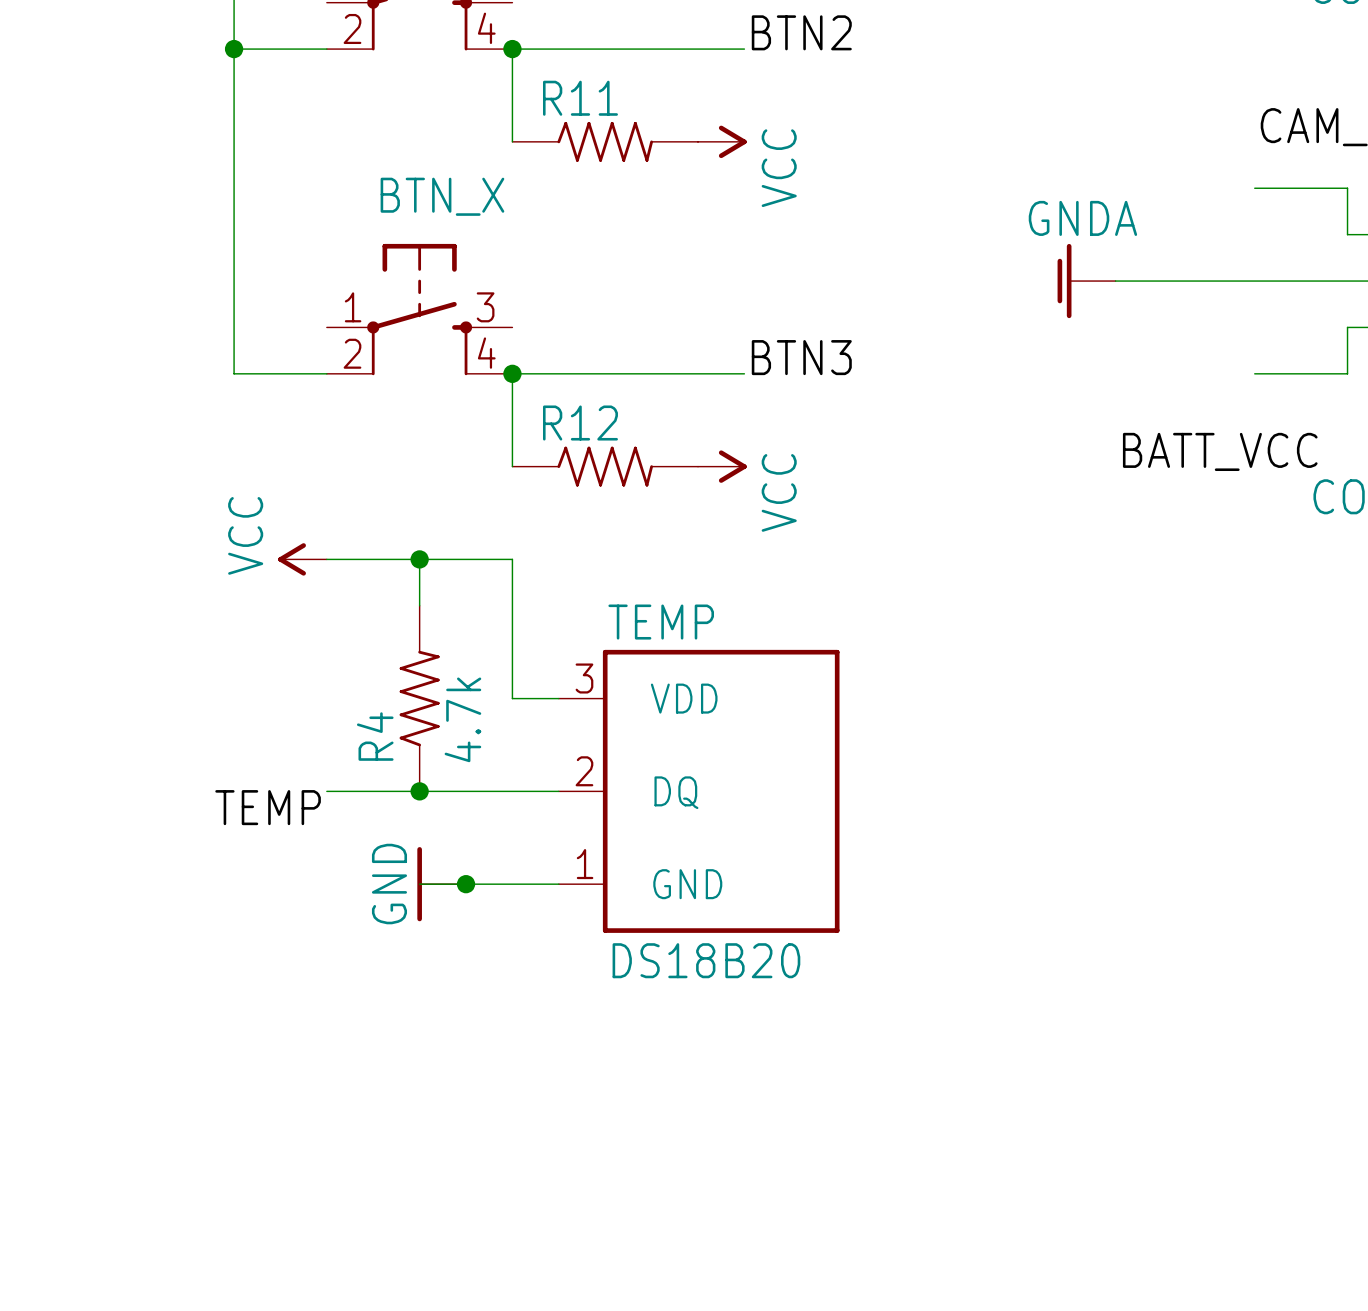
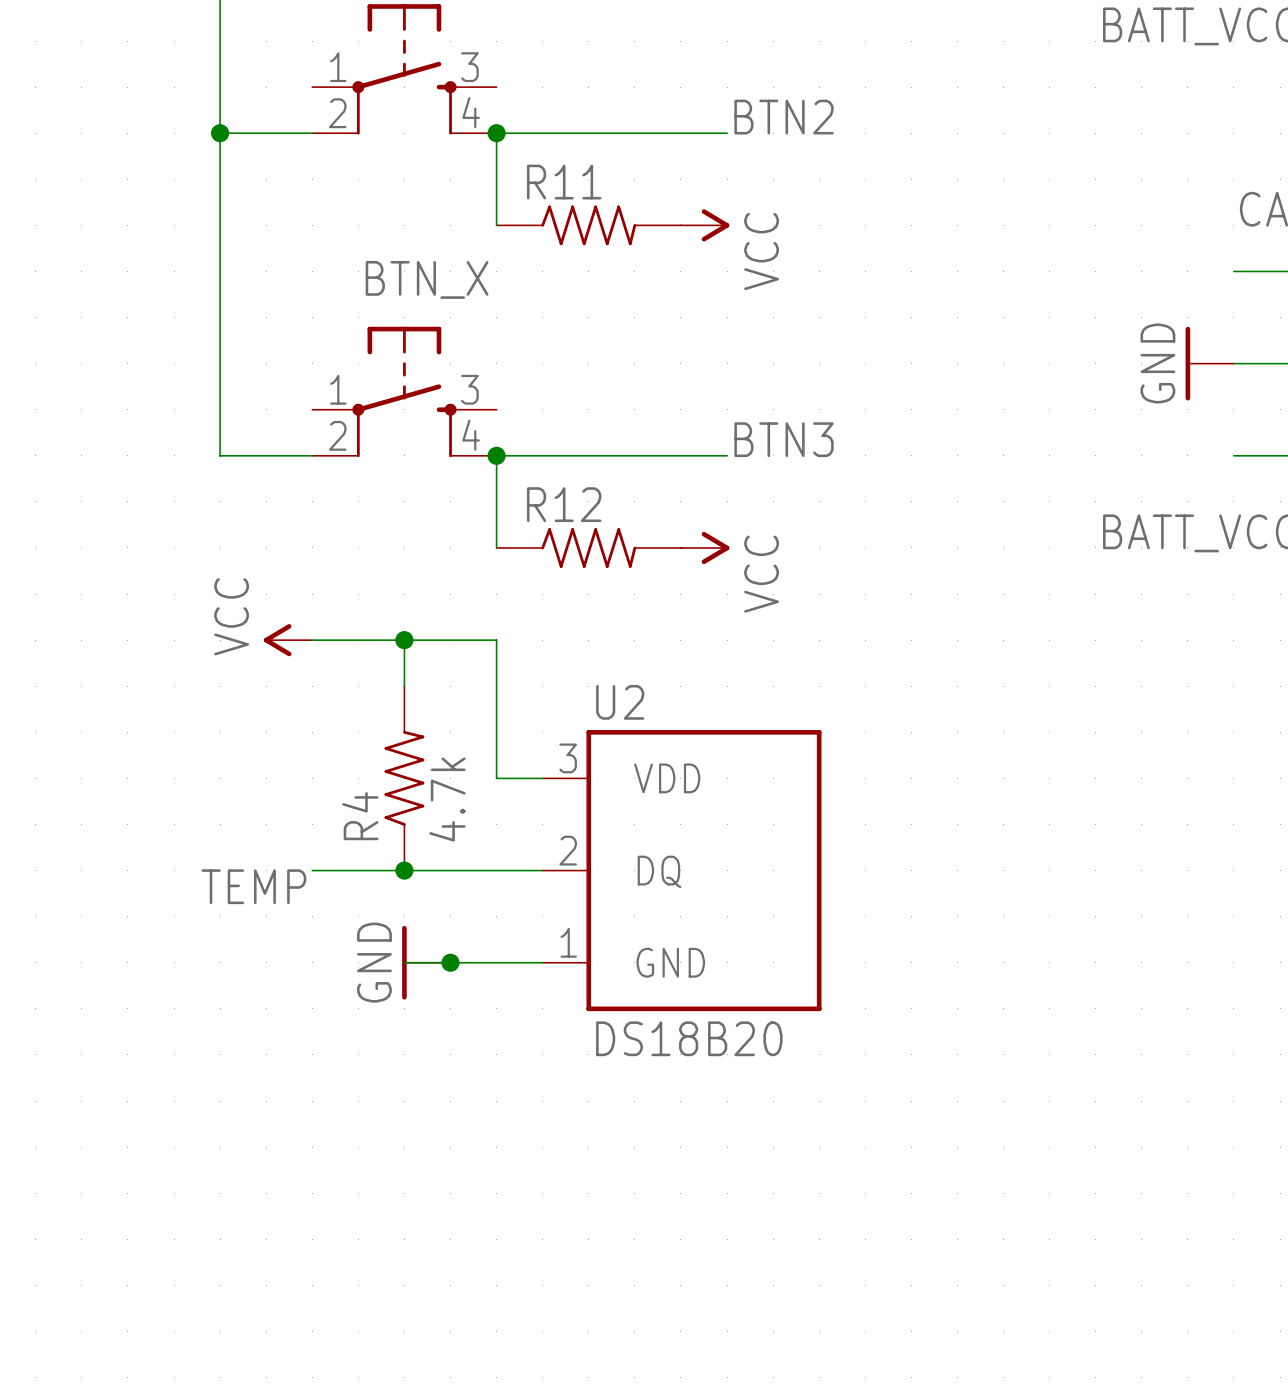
power symbol: GNDA (1086, 281) -> none
wire: (1115, 281) (1254, 281) -> none
power symbol: none -> GND (1209, 363)
TEMP name: TEMP (661, 622) -> U2 (620, 702)

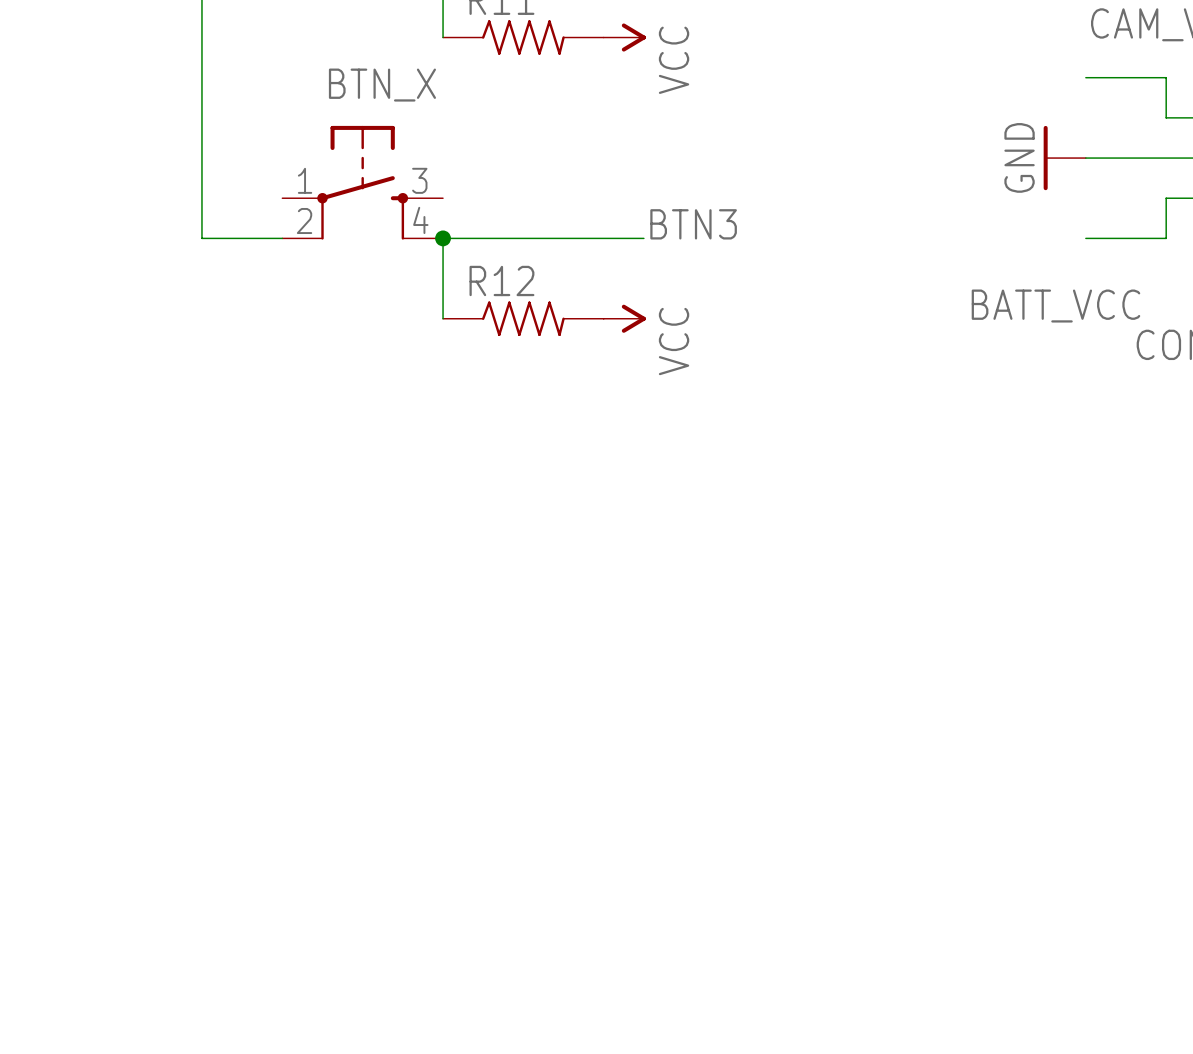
power symbol: VCC (288, 640) -> none
wire: (312, 640) (496, 640) (496, 778) (542, 778) -> none
wire: (404, 640) (404, 686) -> none
junction: (404, 640) -> none
R4: 4.7k (404, 778) -> none
wire: (312, 870) (542, 870) -> none
junction: (404, 870) -> none
U2: DS18B20 (682, 870) -> none
label: TEMP (253, 886) -> none
wire: (404, 962) (542, 962) -> none
power symbol: GND (426, 962) -> none
junction: (450, 962) -> none

